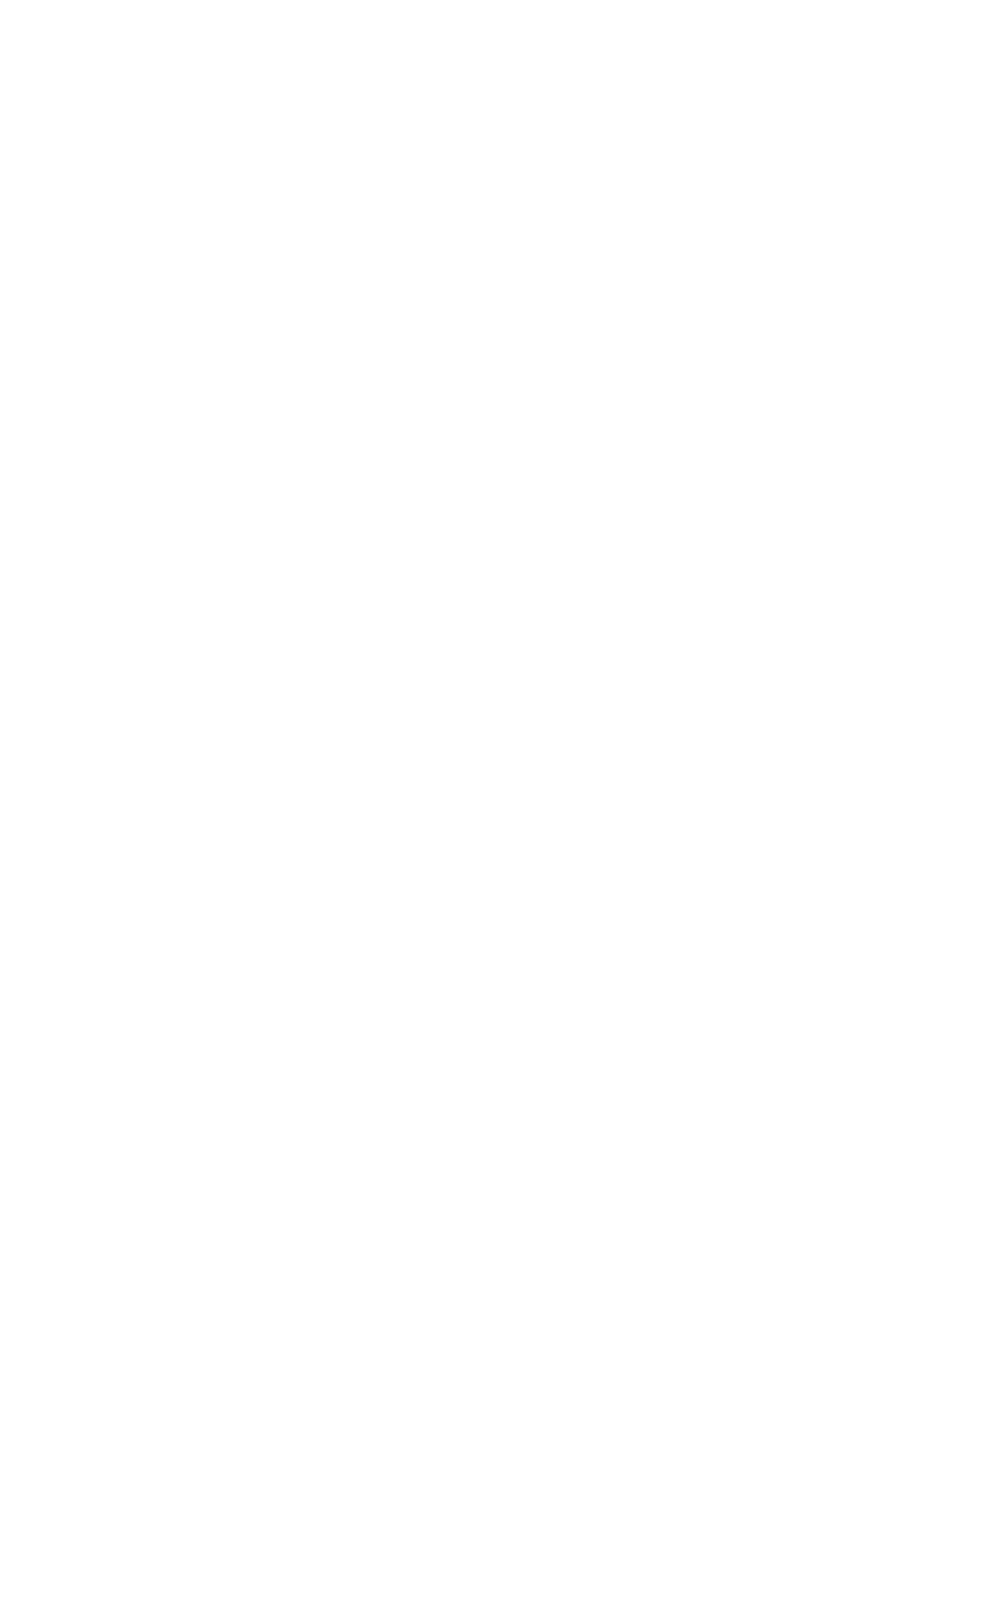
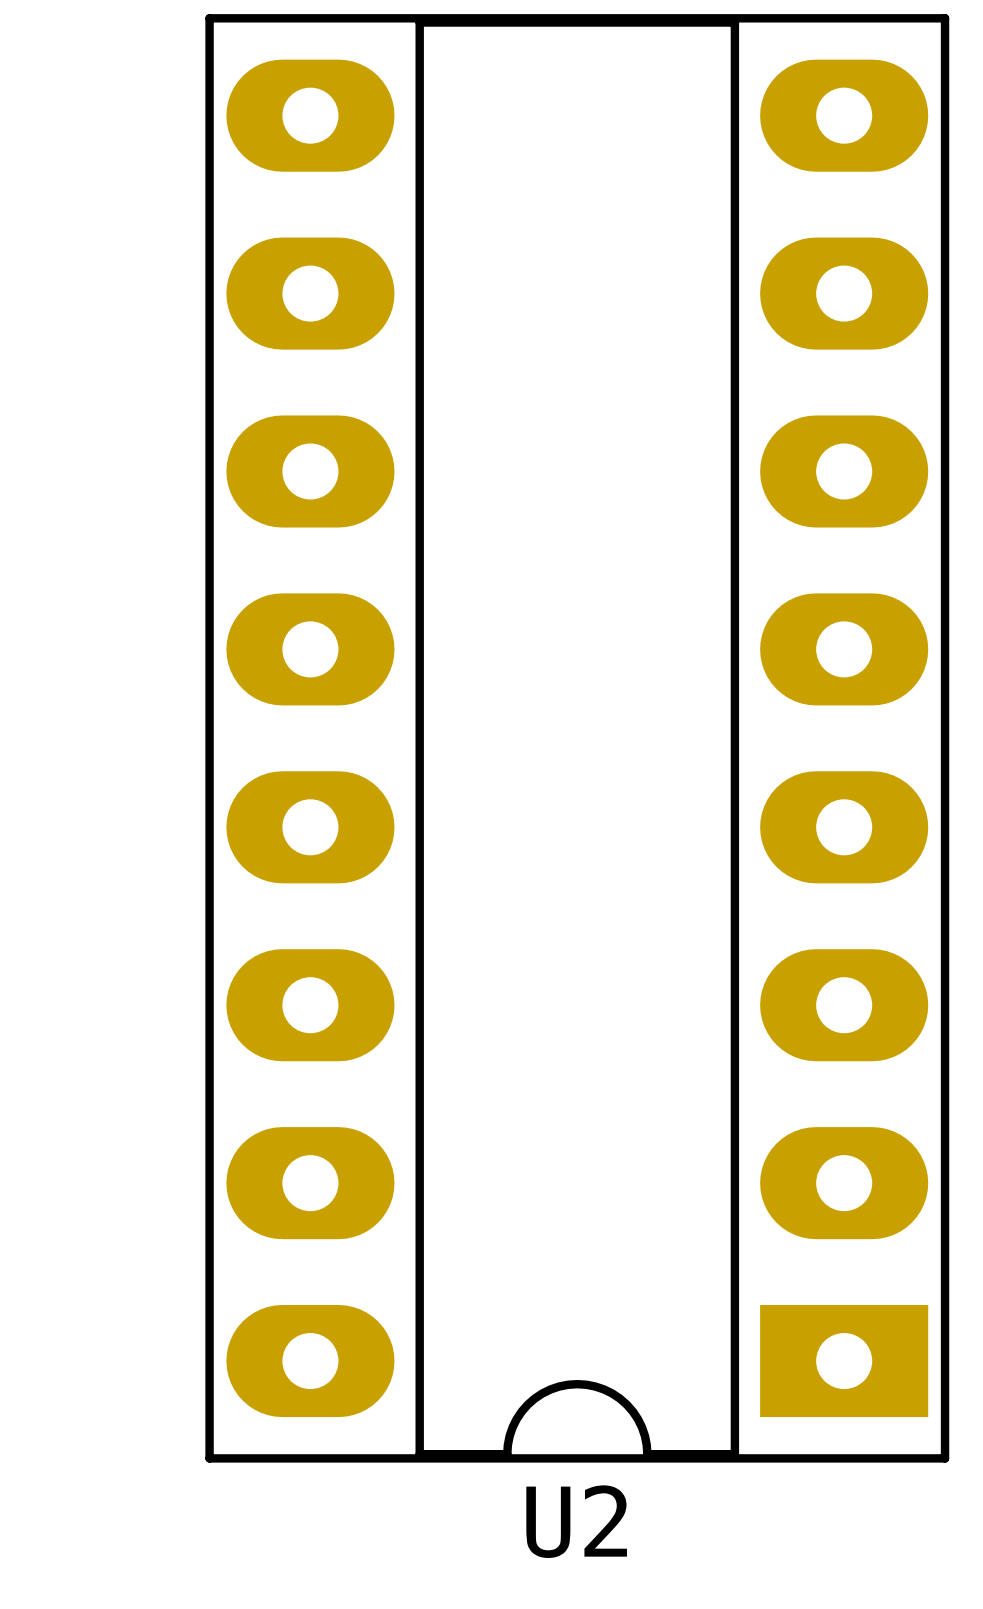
U2: none -> (577, 738)

